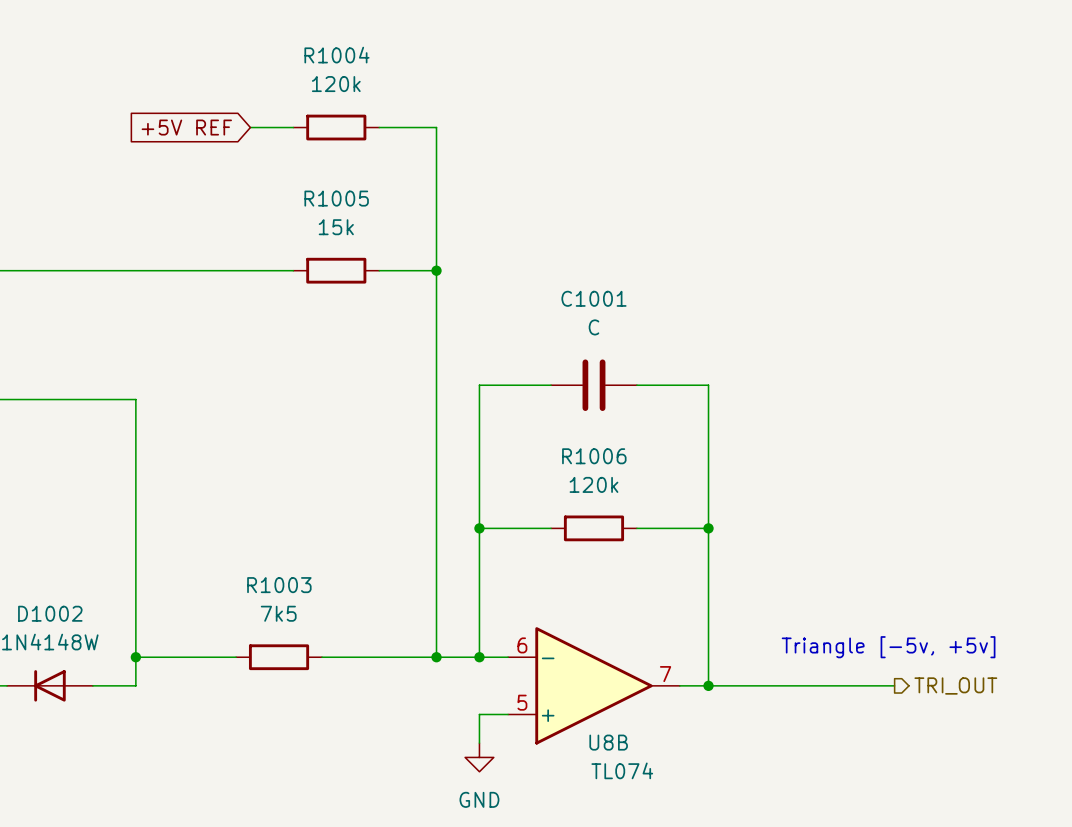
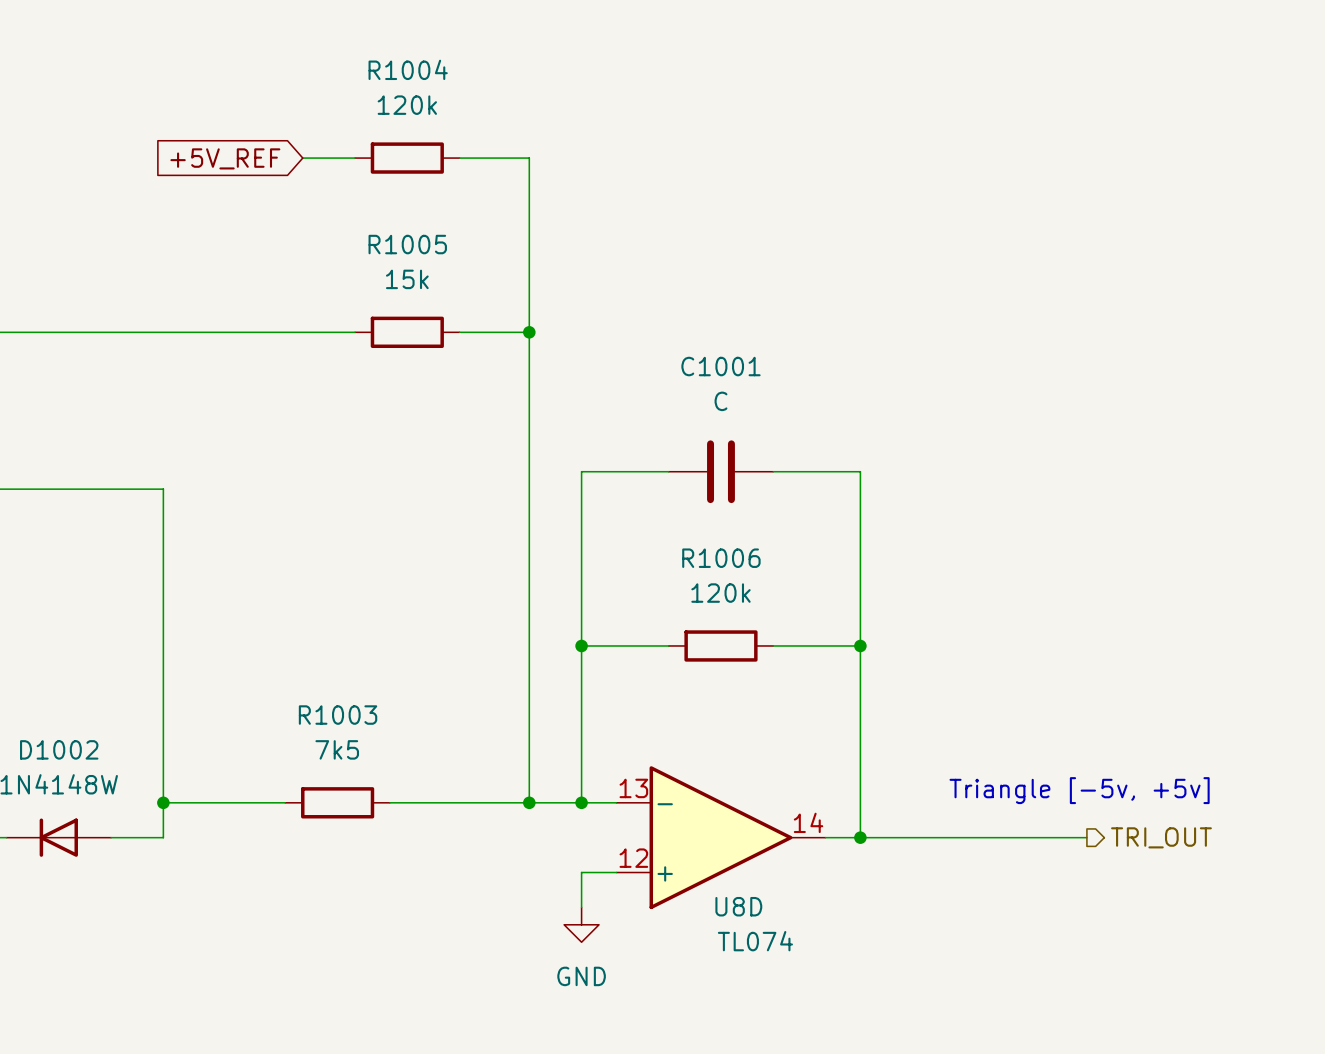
global label: +5V REF (186, 127) -> +5V_REF (225, 158)
U8B pin number: 6 (522, 645) -> 13 (633, 788)
U8B pin number: 7 (665, 674) -> 14 (808, 822)
U8B pin number: 5 (522, 702) -> 12 (633, 858)
U8B name: U8B (608, 742) -> U8D (738, 906)

